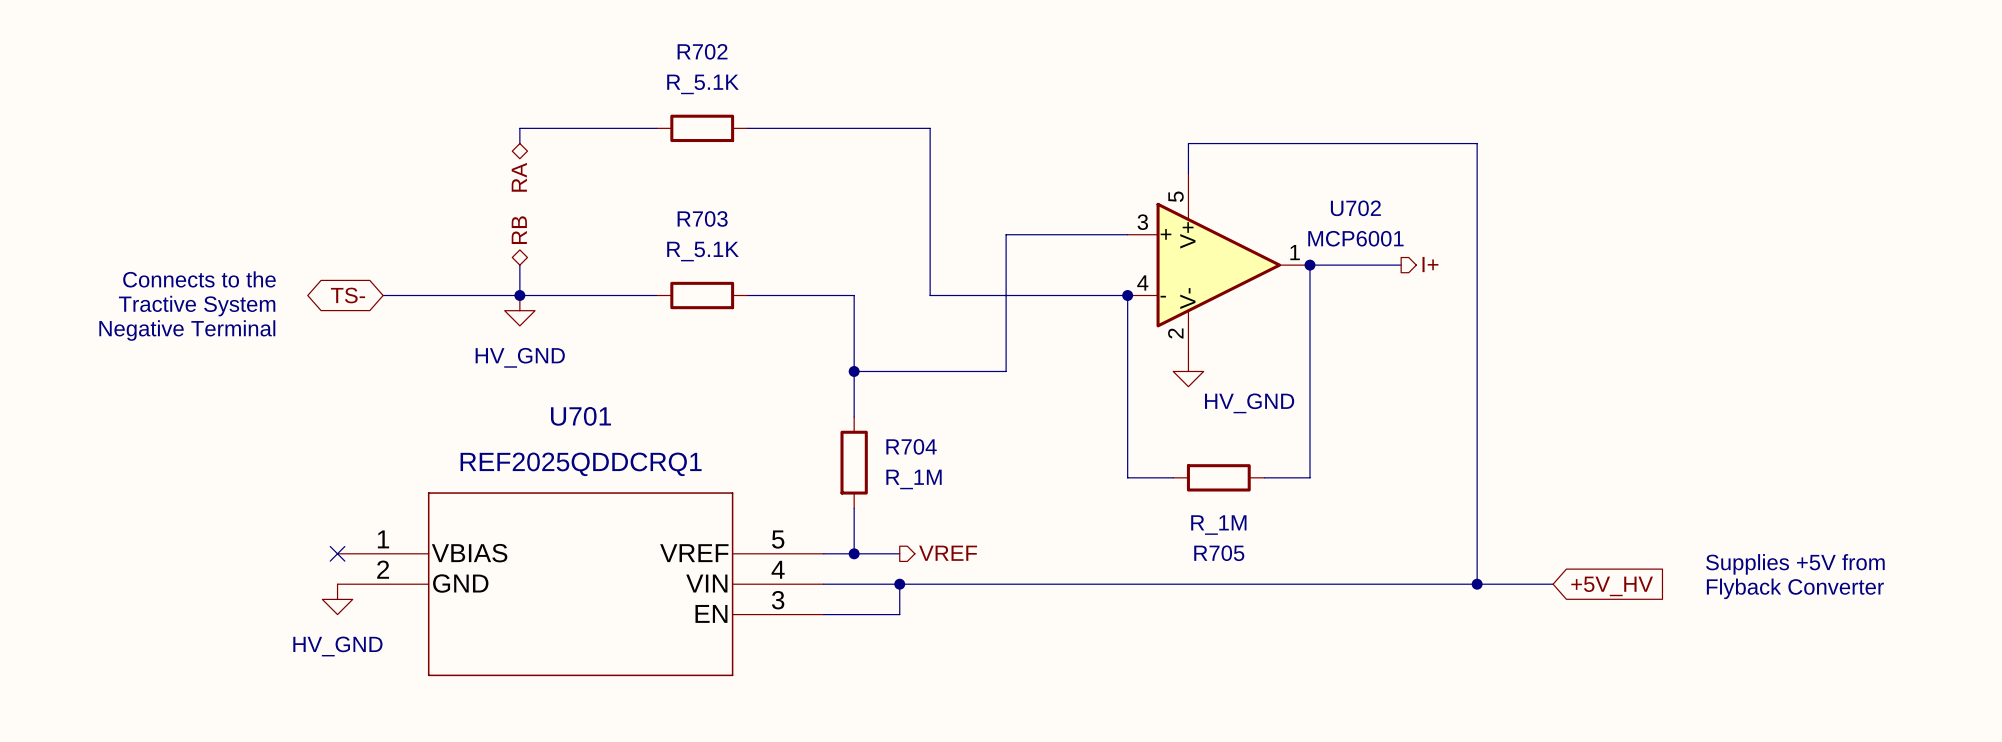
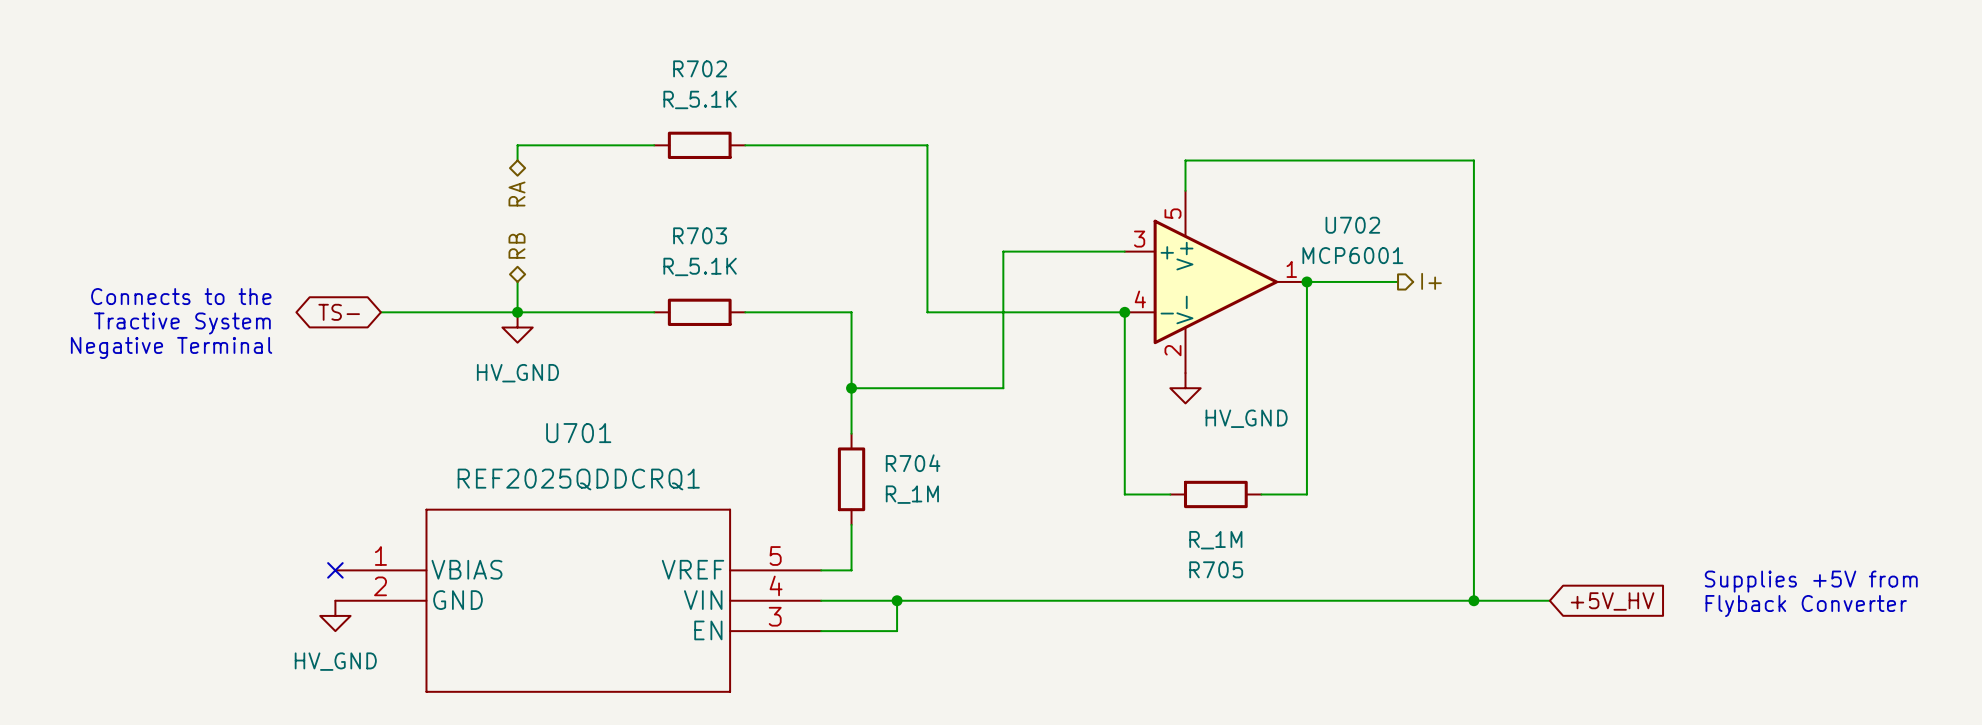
wire: (854, 553) (899, 553) -> none
junction: (854, 553) -> none
hierarchical label: VREF (948, 553) -> none

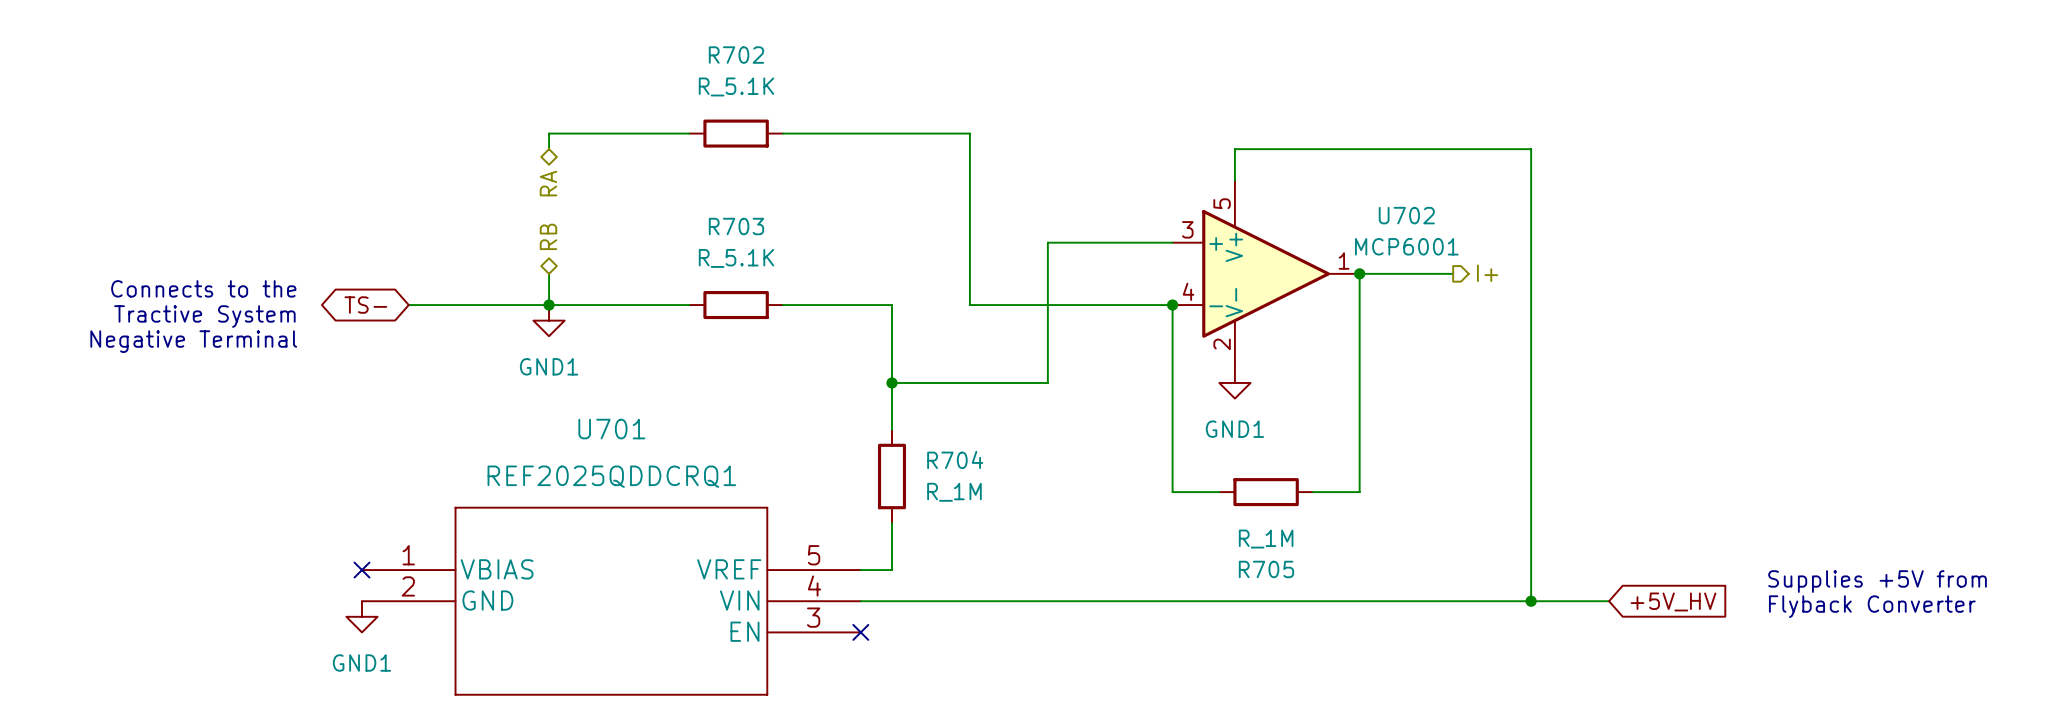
power symbol: HV_GND (517, 327) -> GND1 (549, 320)
power symbol: HV_GND (1185, 388) -> GND1 (1234, 382)
wire: (897, 600) (897, 631) (821, 631) -> none
junction: (897, 600) -> none
power symbol: HV_GND (335, 615) -> GND1 (361, 616)
no-connect mark: none -> (860, 632)

